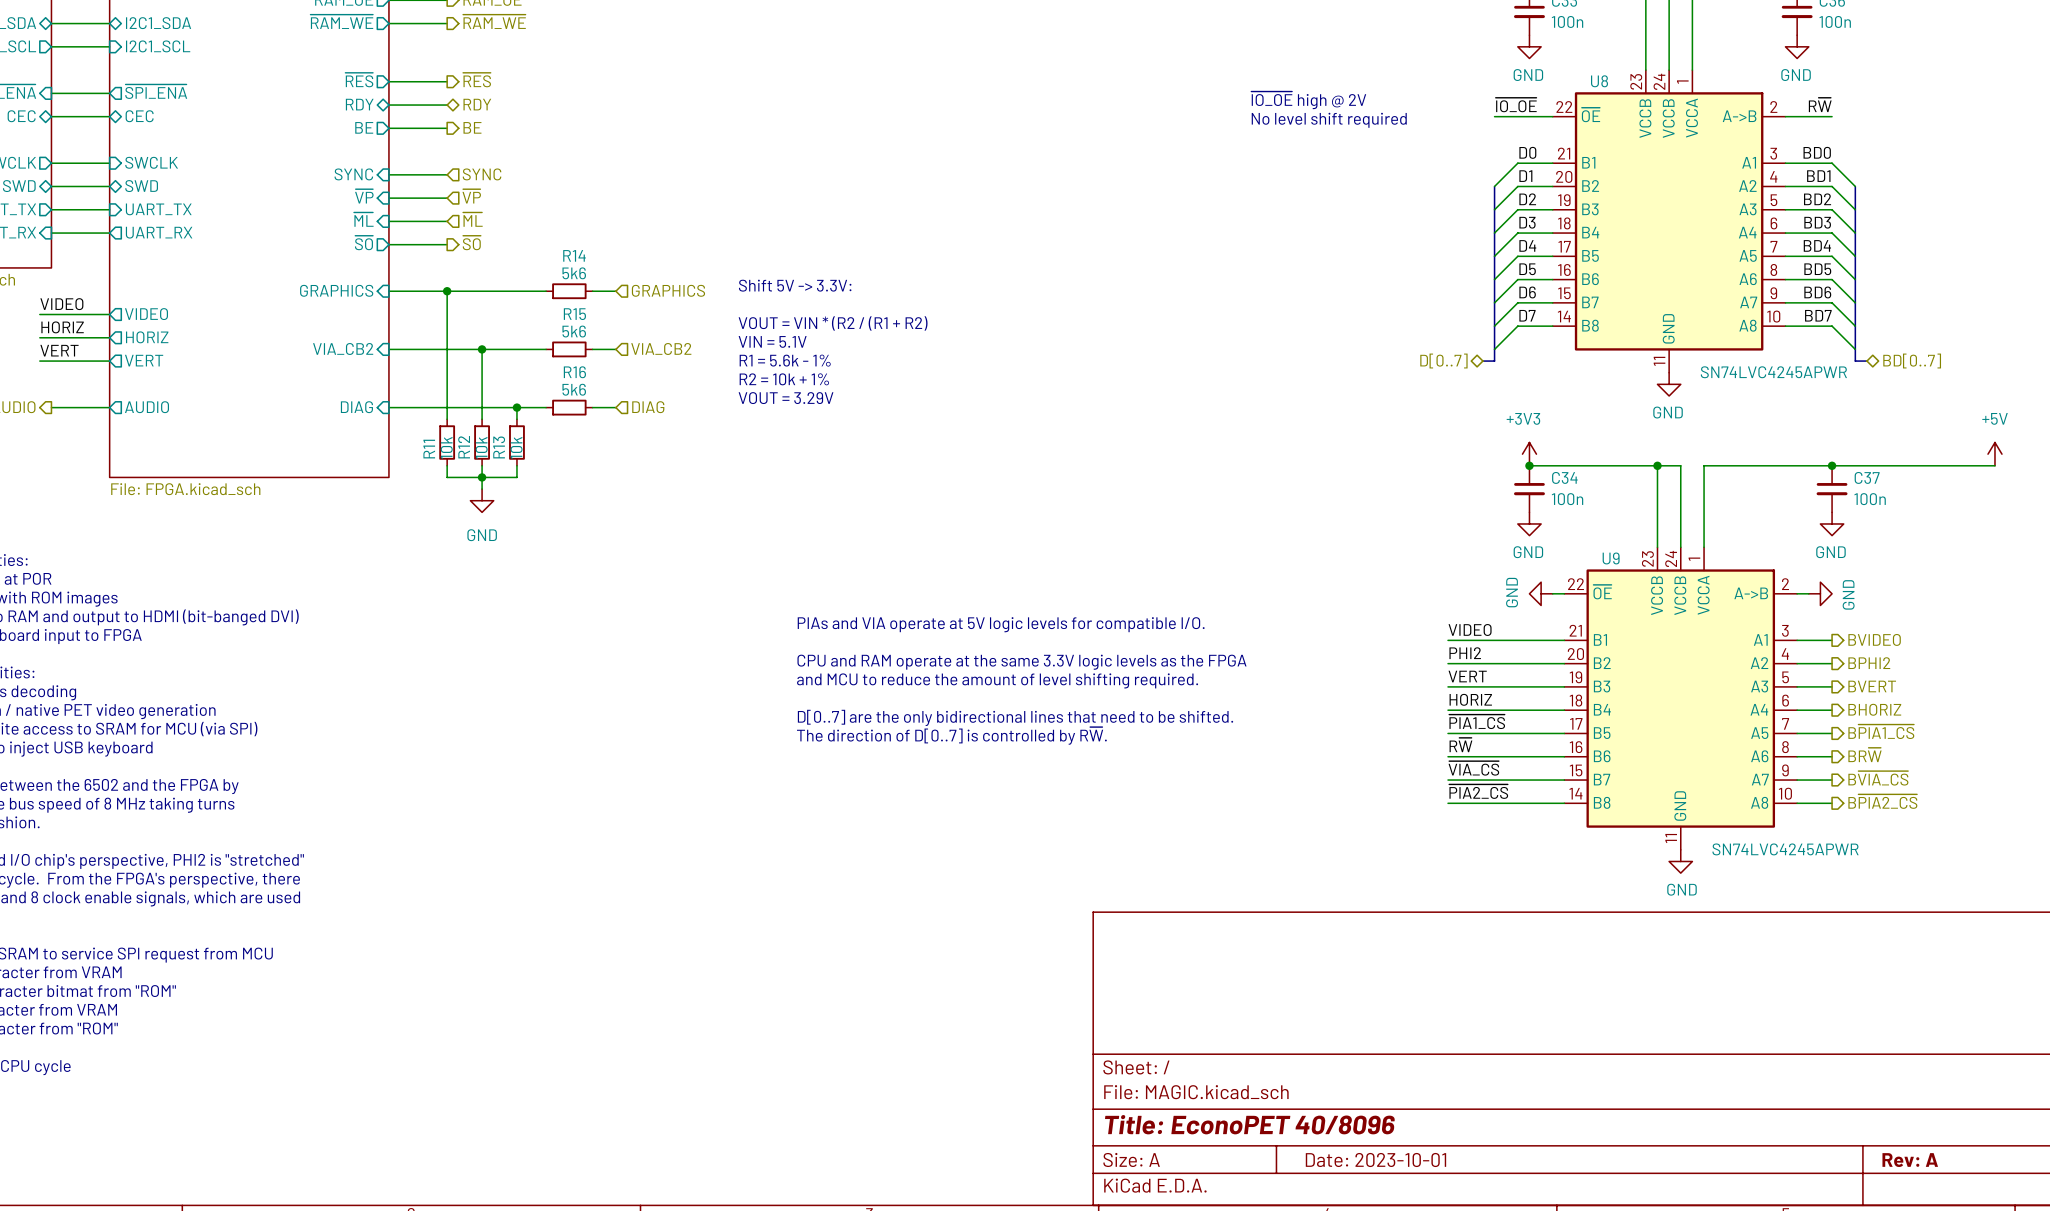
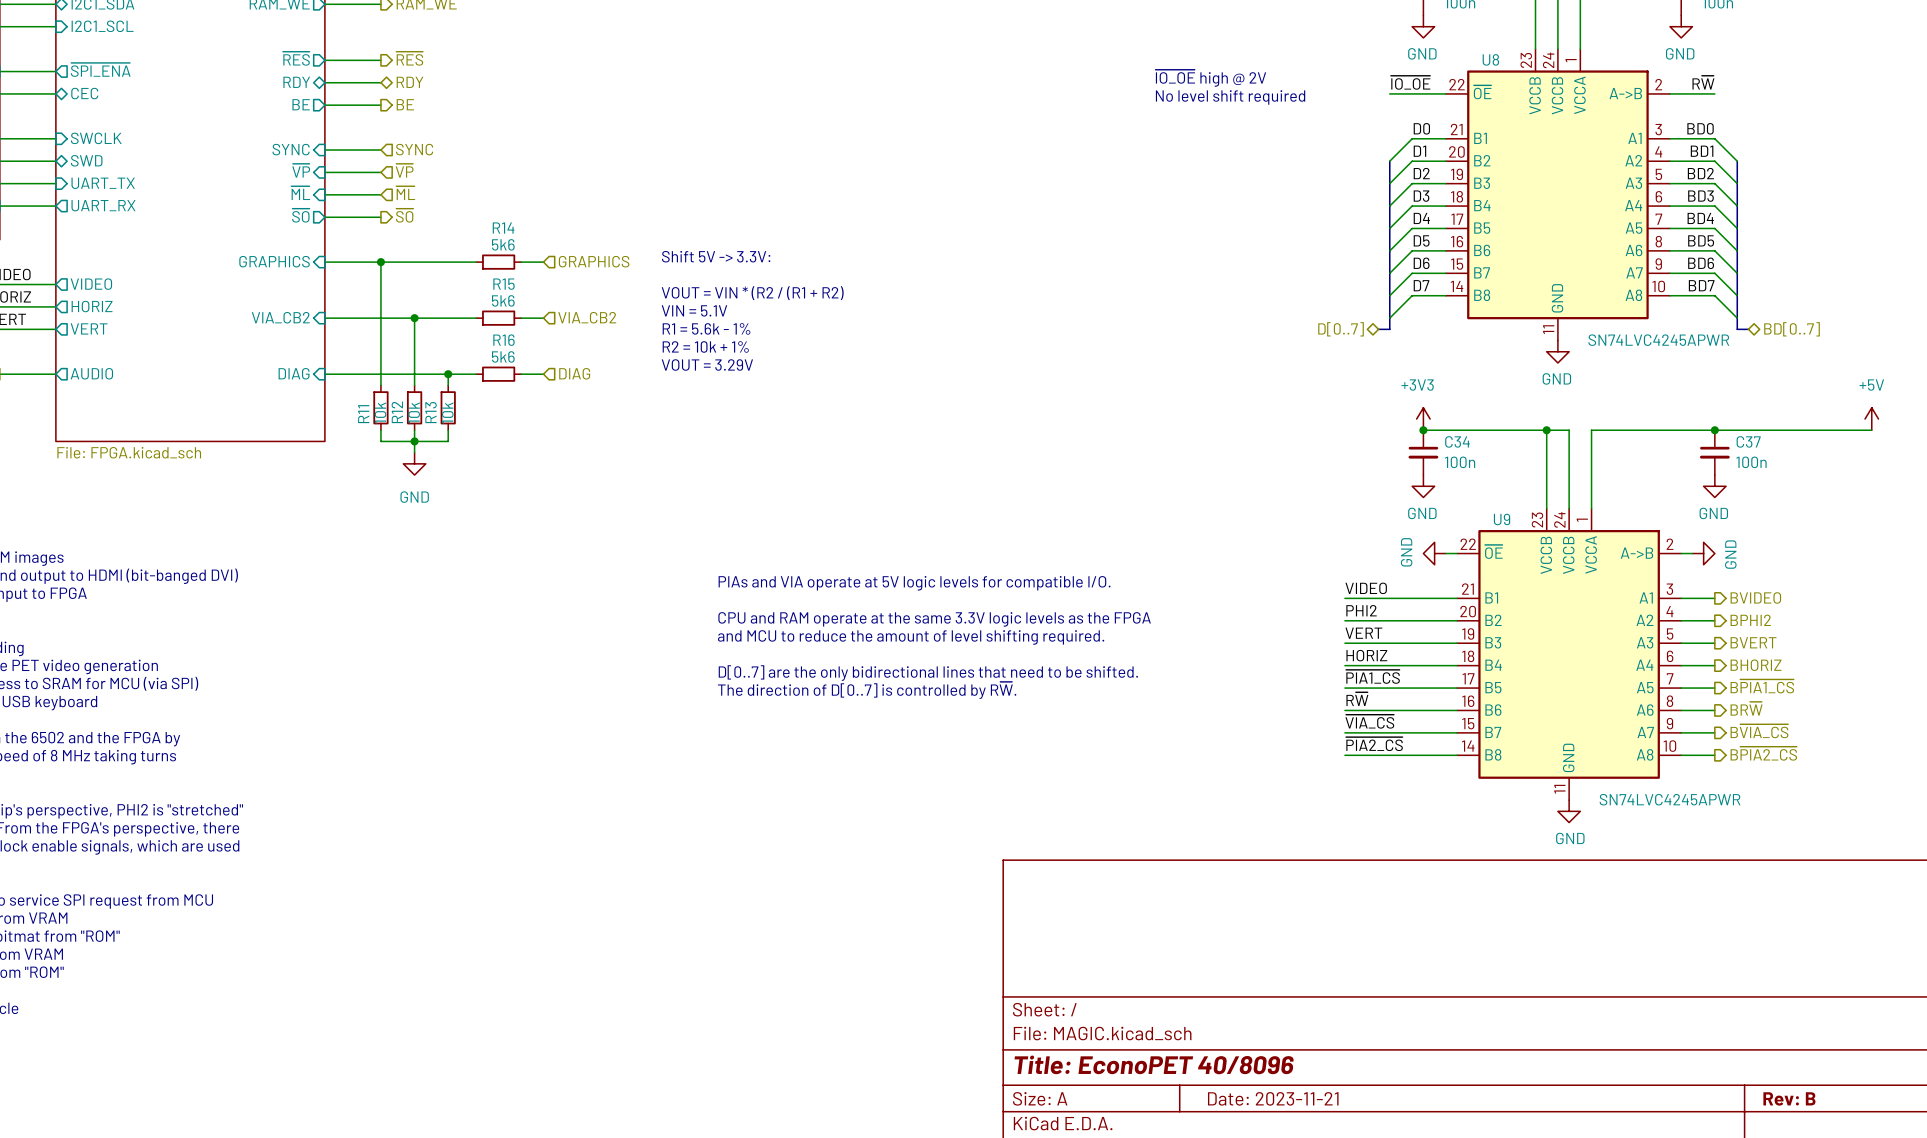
title block: Date: 2023-10-01 (1375, 1159) -> Date: 2023-11-21 (1273, 1098)
title block: Rev: A (1910, 1160) -> Rev: B (1789, 1098)

